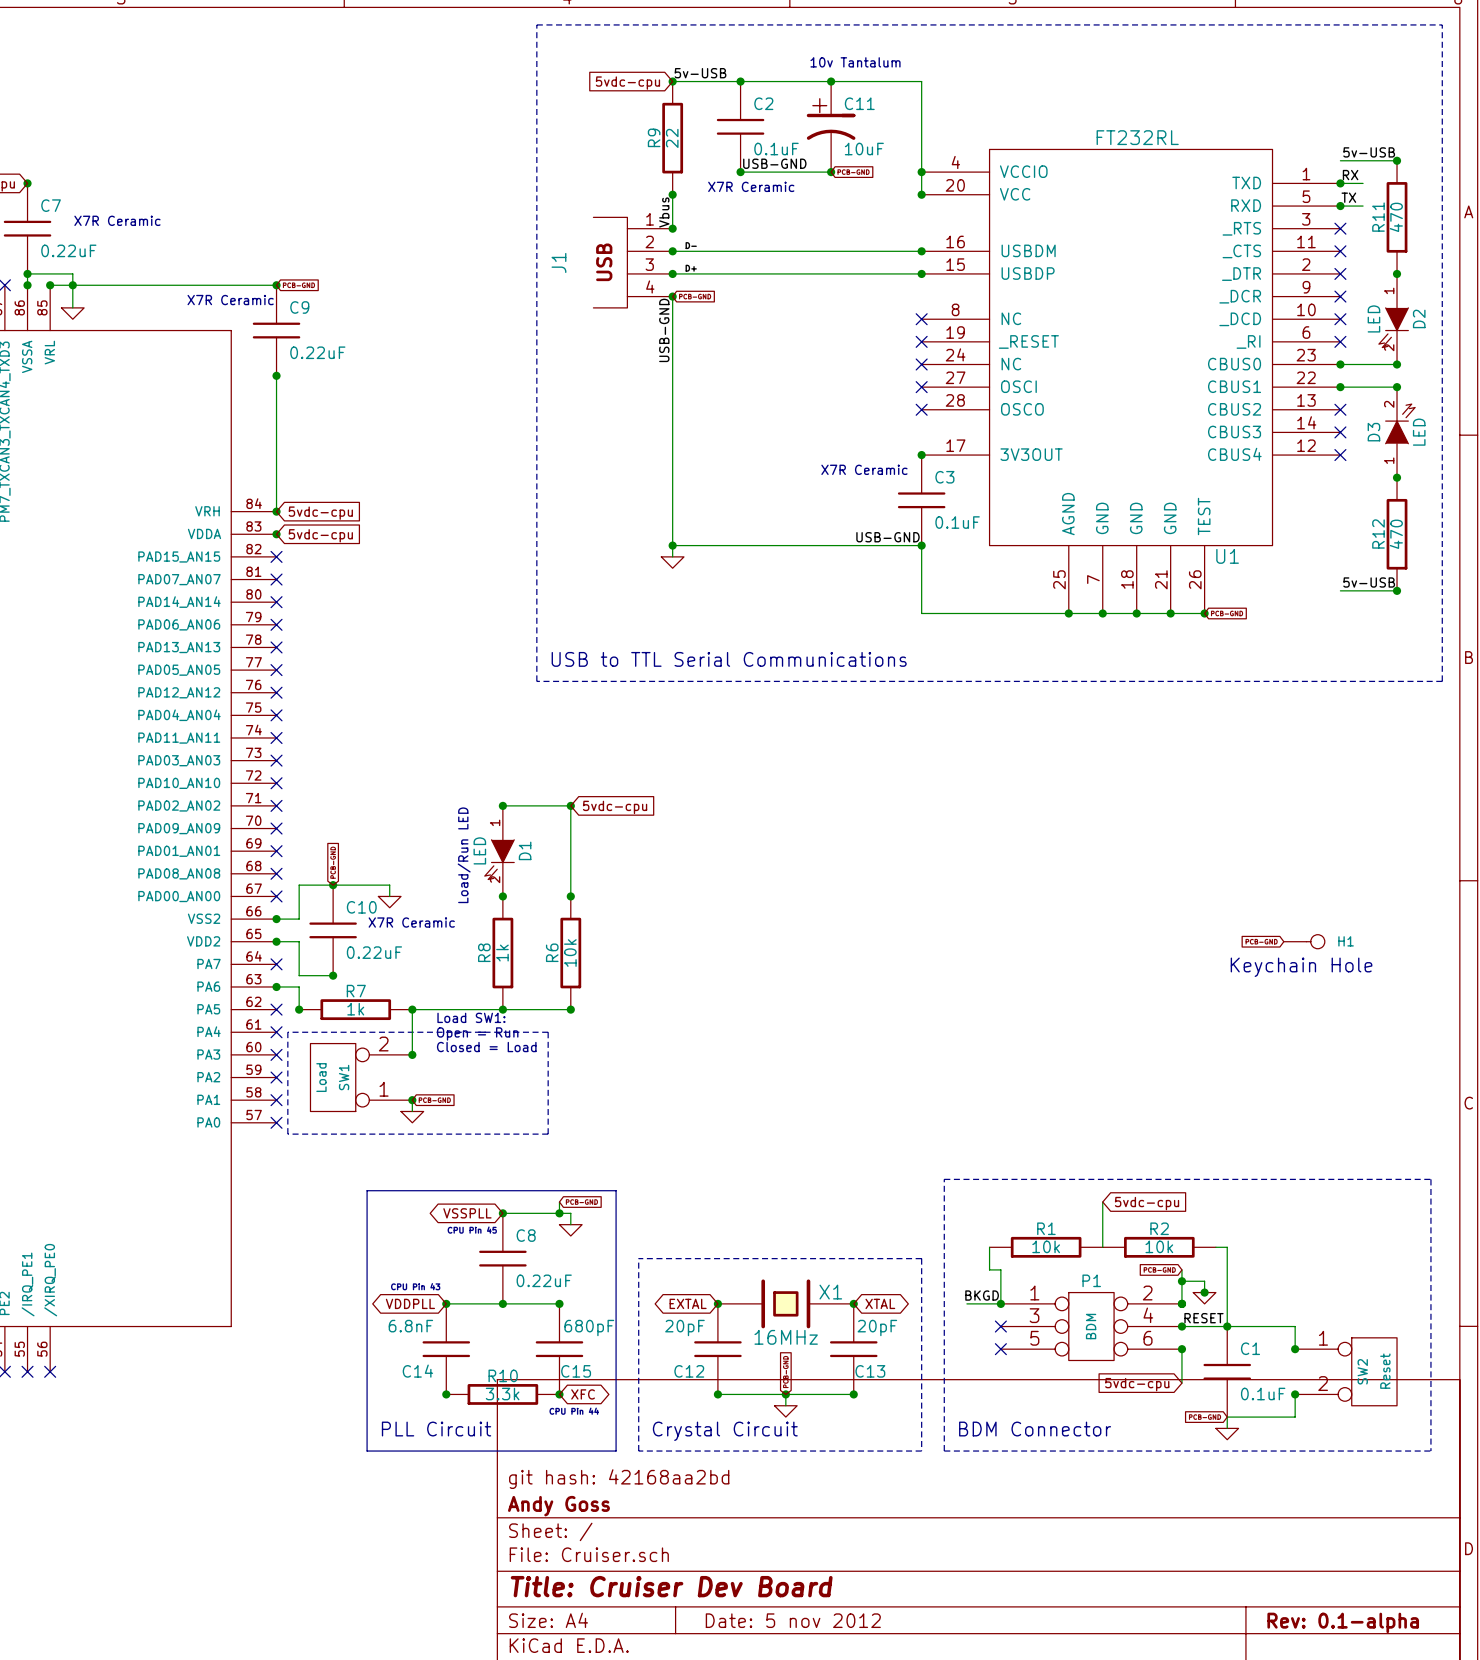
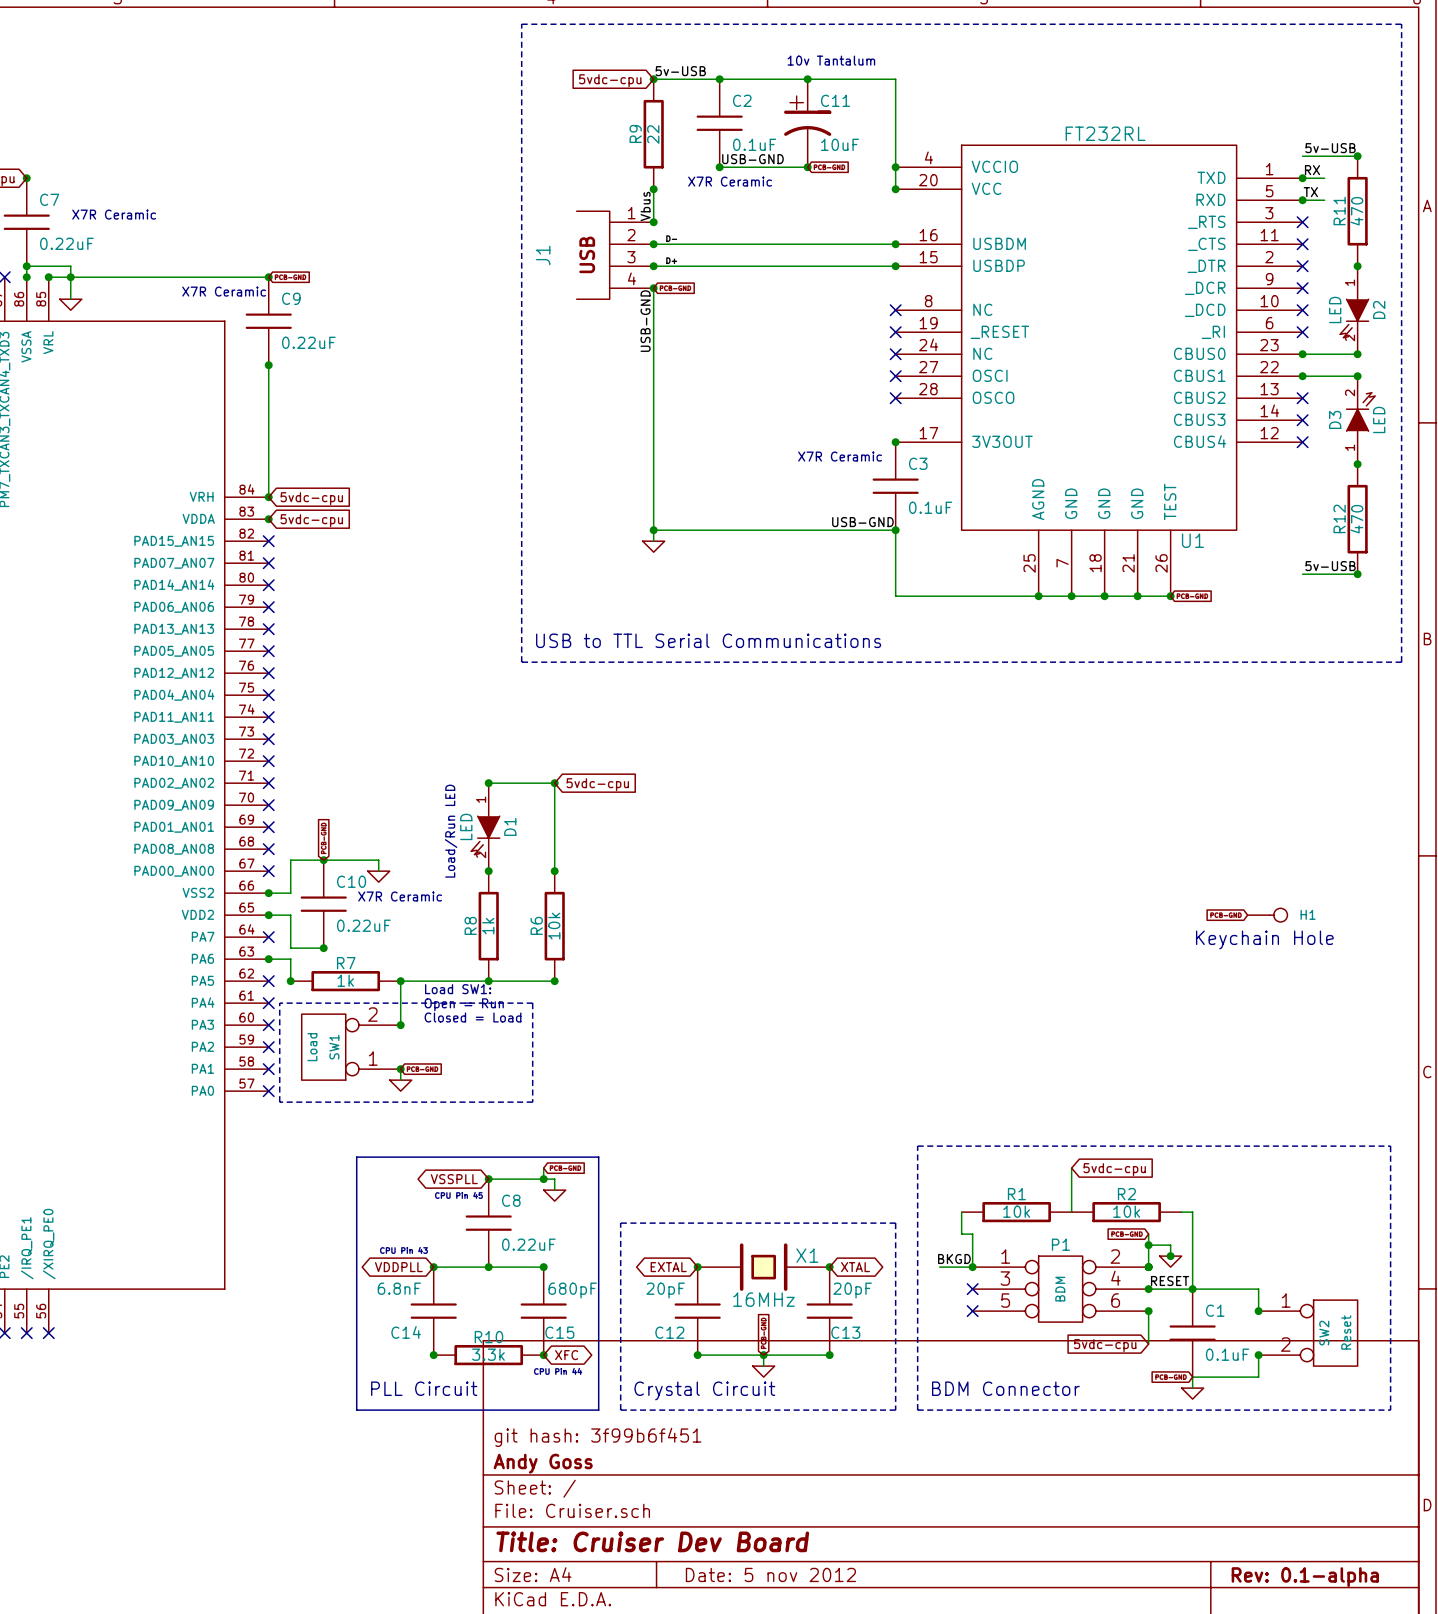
title block: git hash: 42168aa2bd (619, 1479) -> git hash: 3f99b6f451 (598, 1437)

